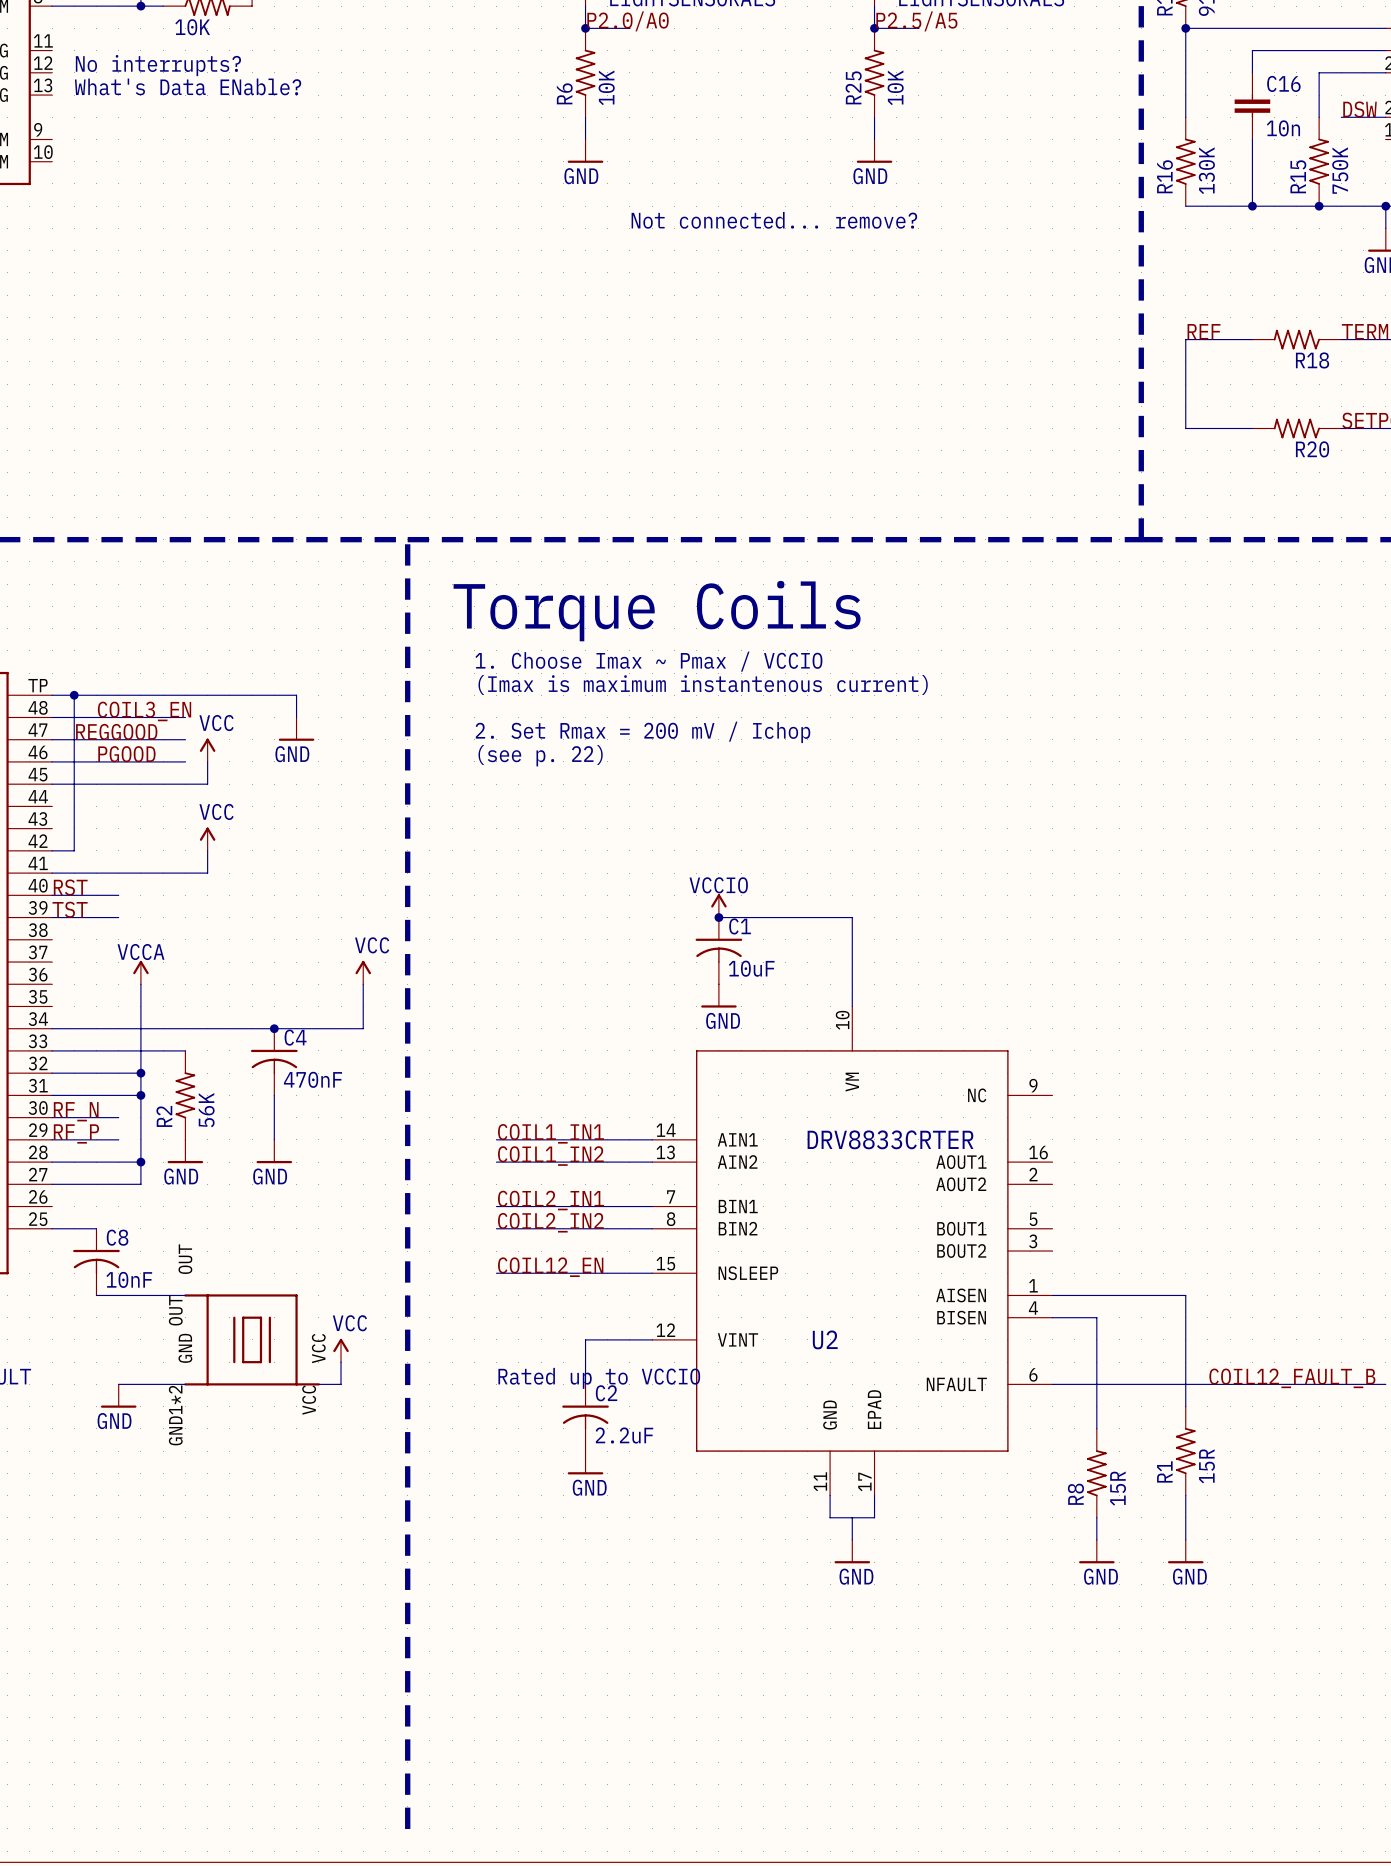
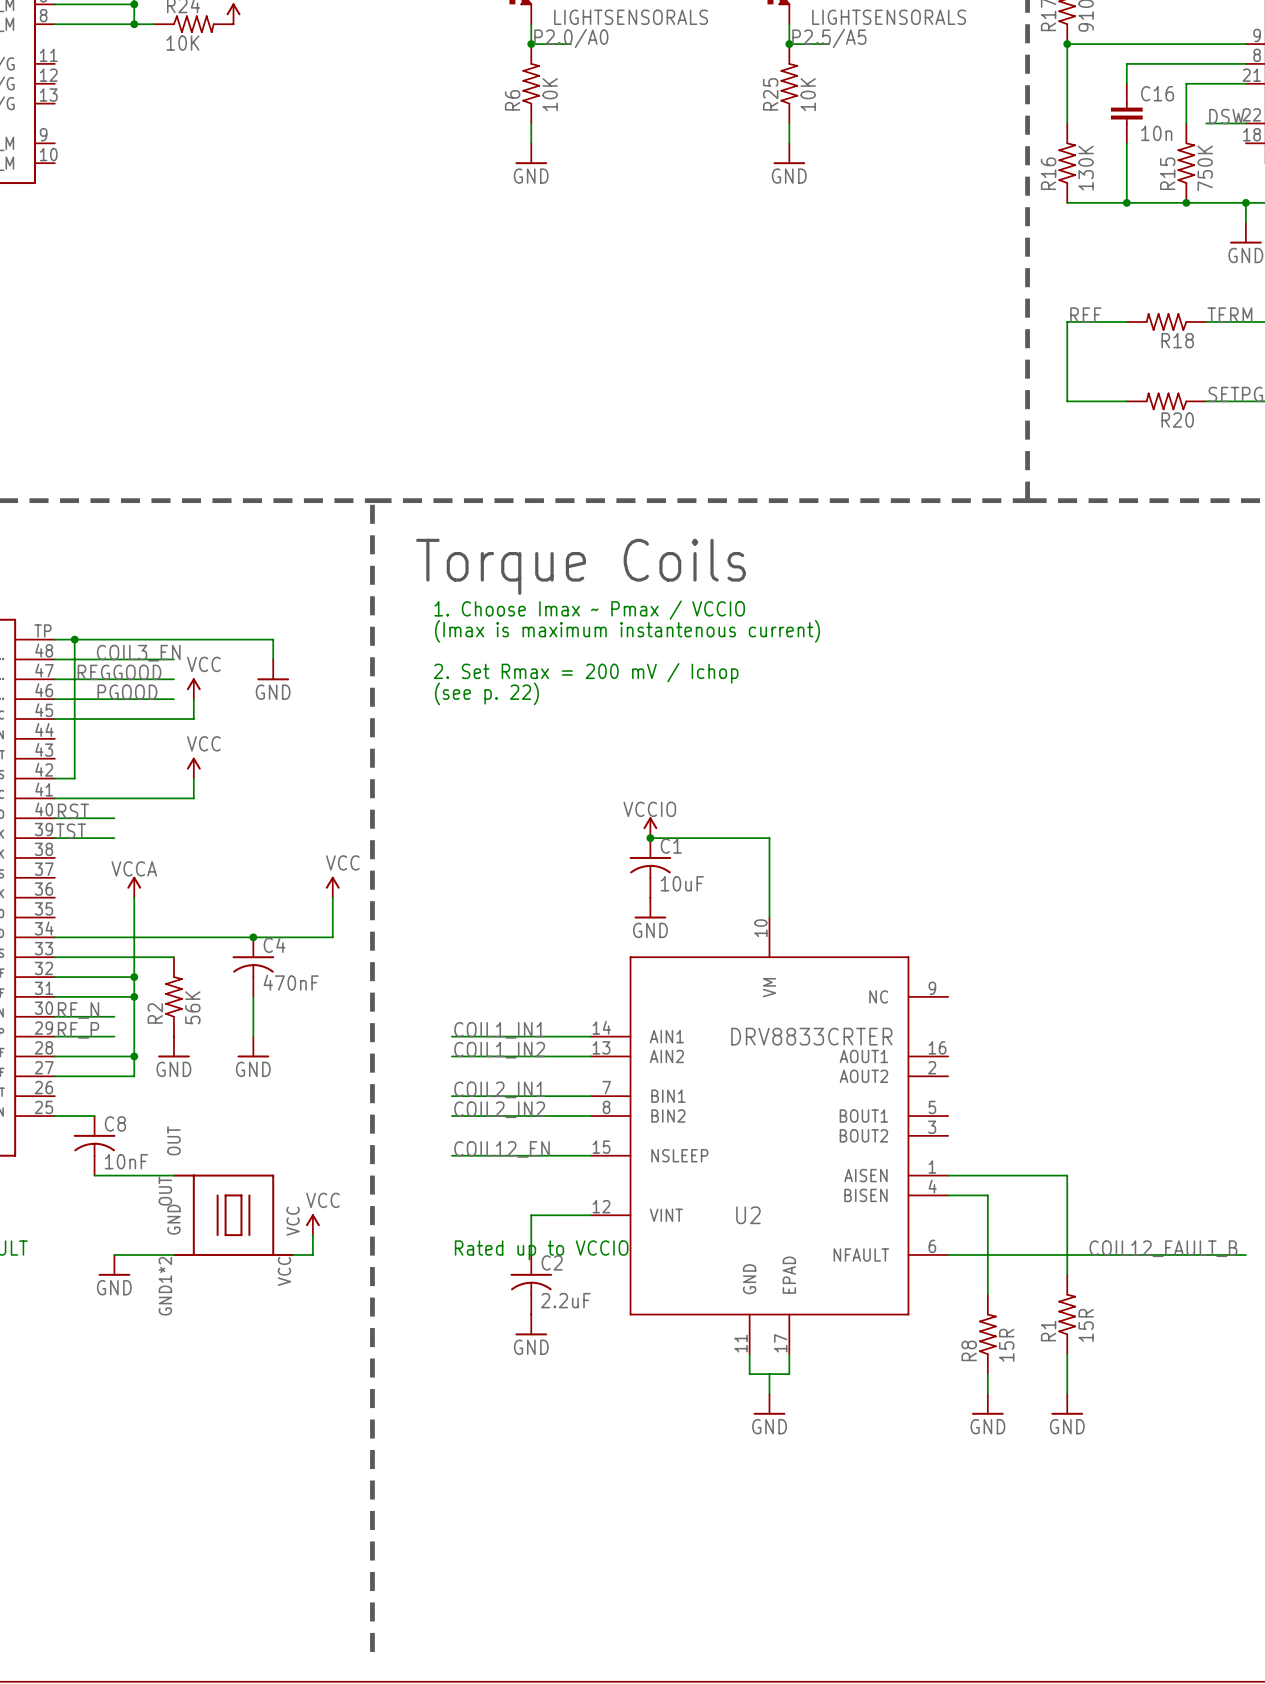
text: No interrupts? (158, 65) -> none
text: What's Data ENable? (188, 86) -> none
text: Not connected... remove? (774, 220) -> none

